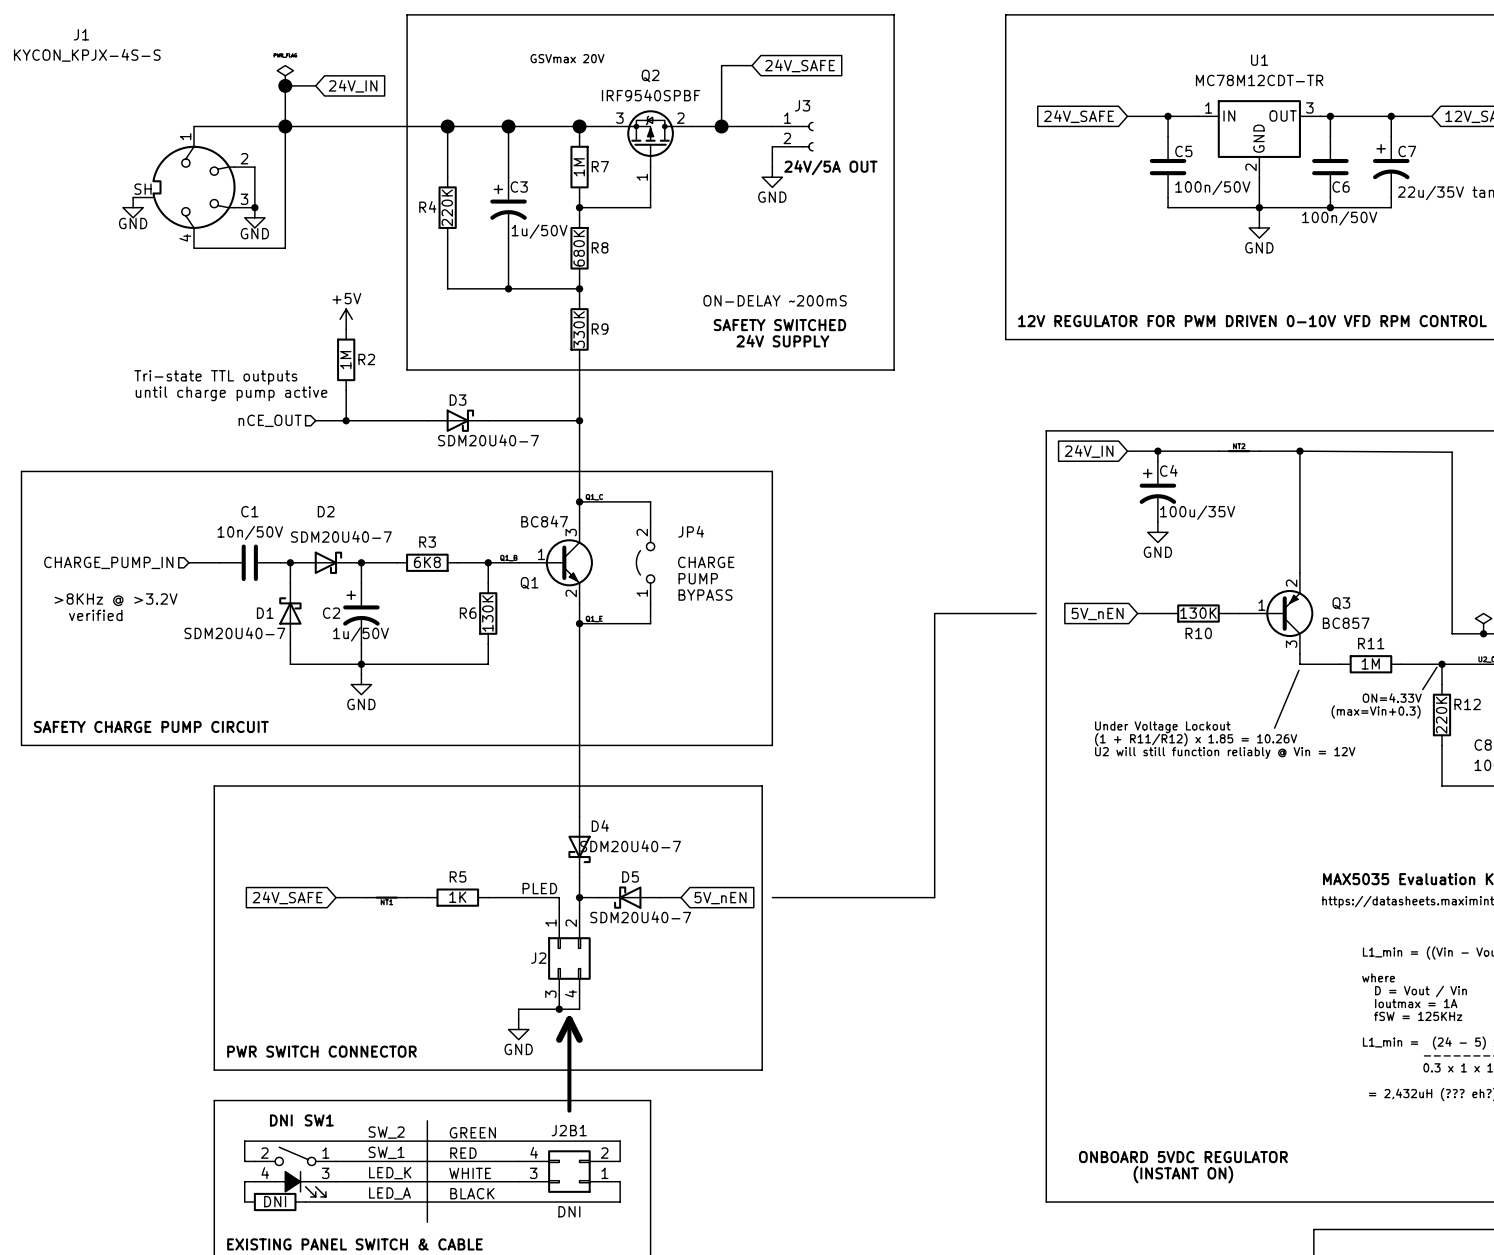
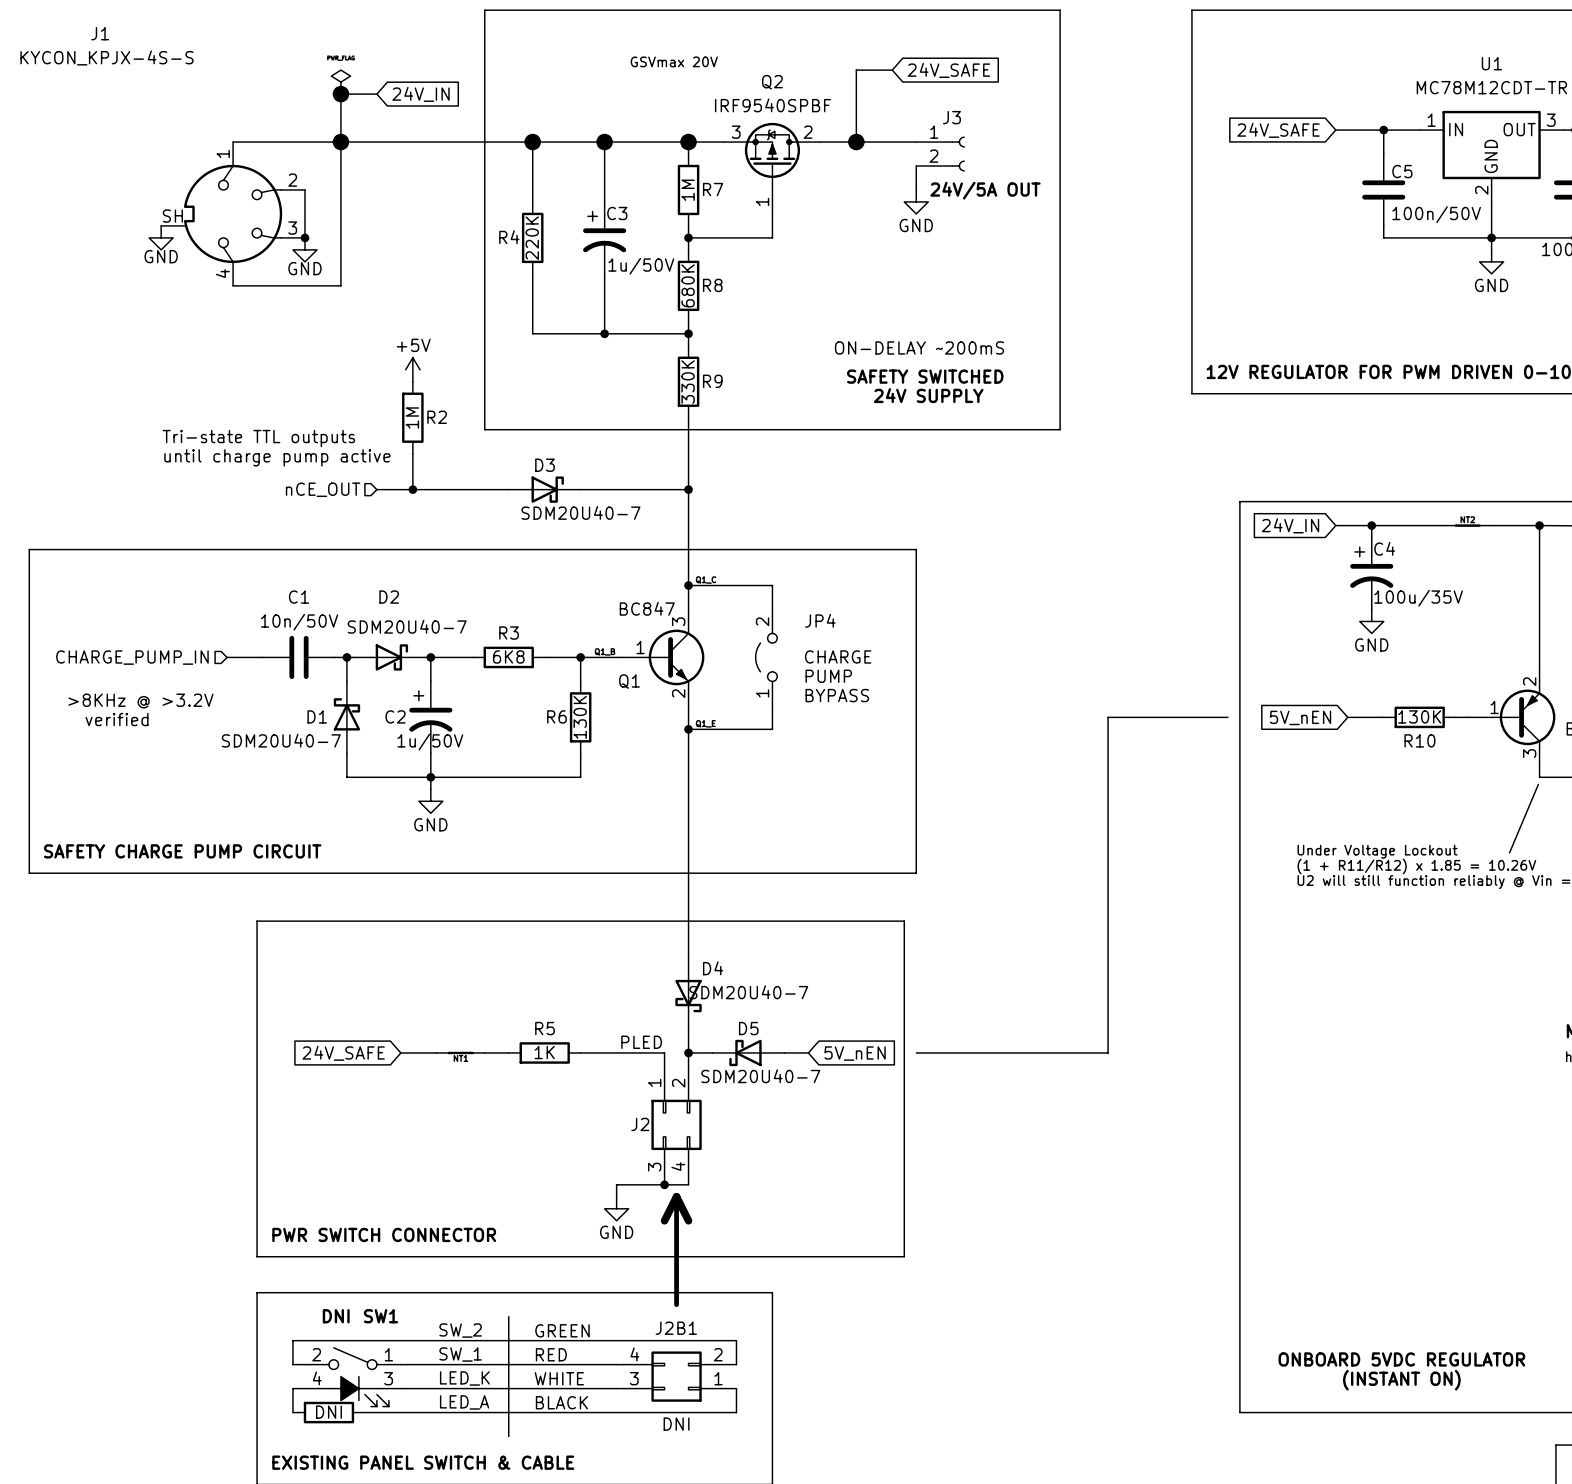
Q1 symbol: [518, 522, 593, 604] -> [616, 609, 705, 706]

